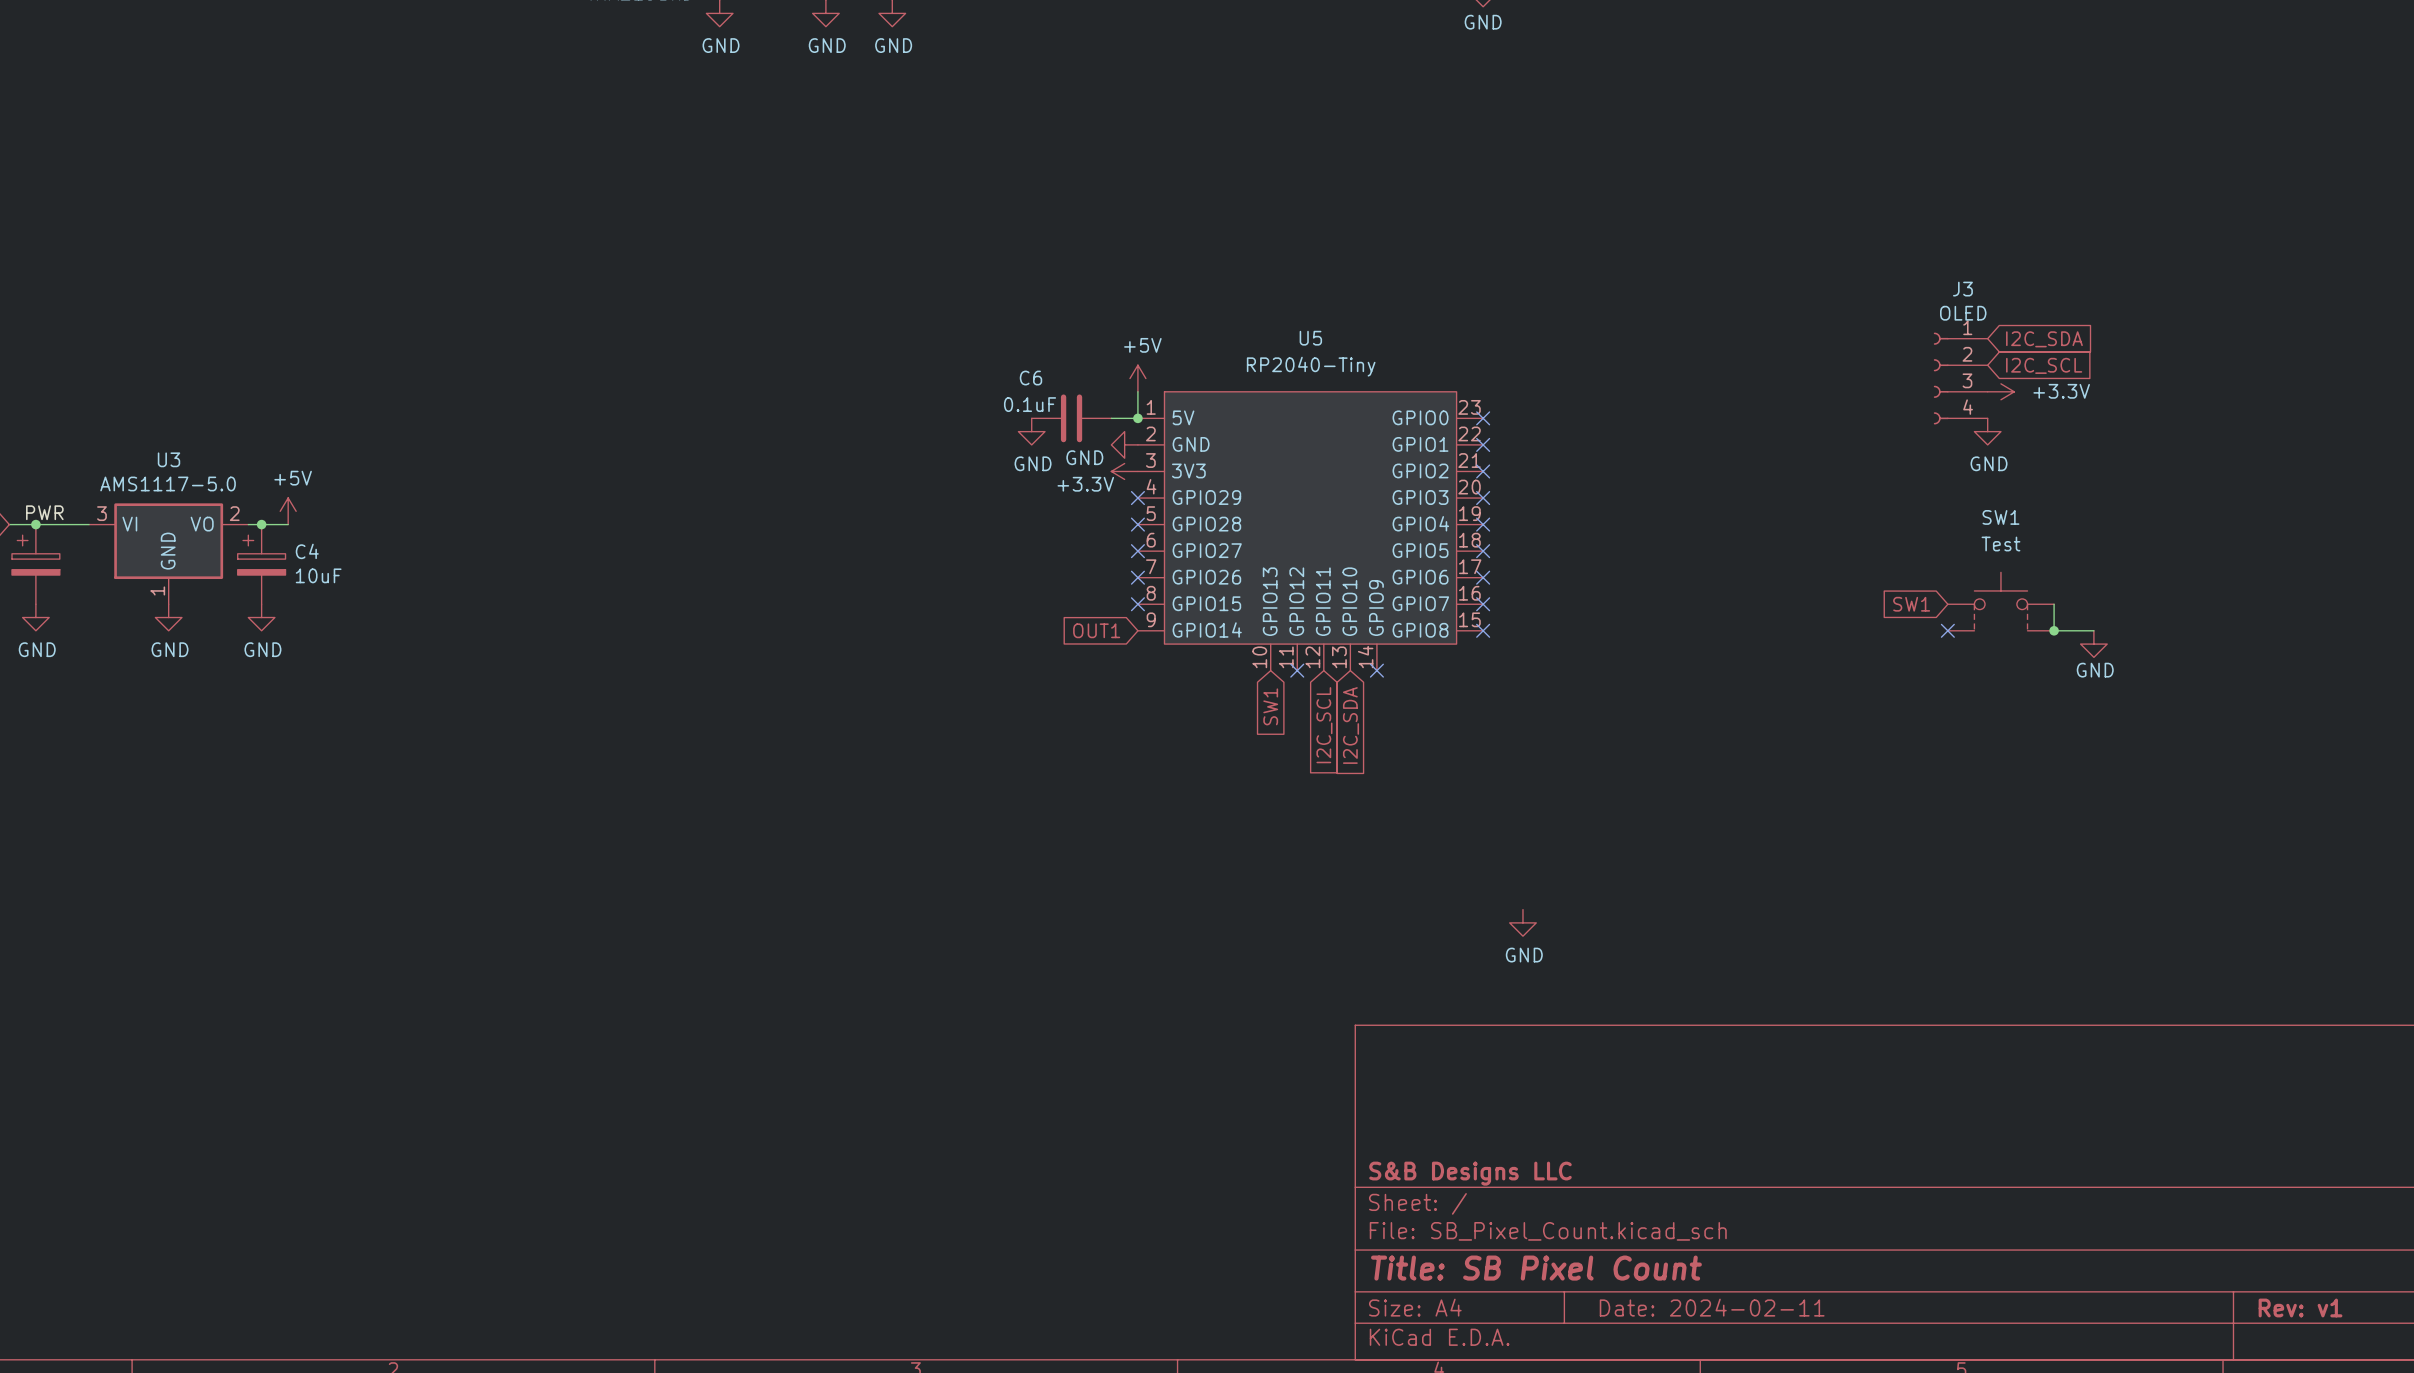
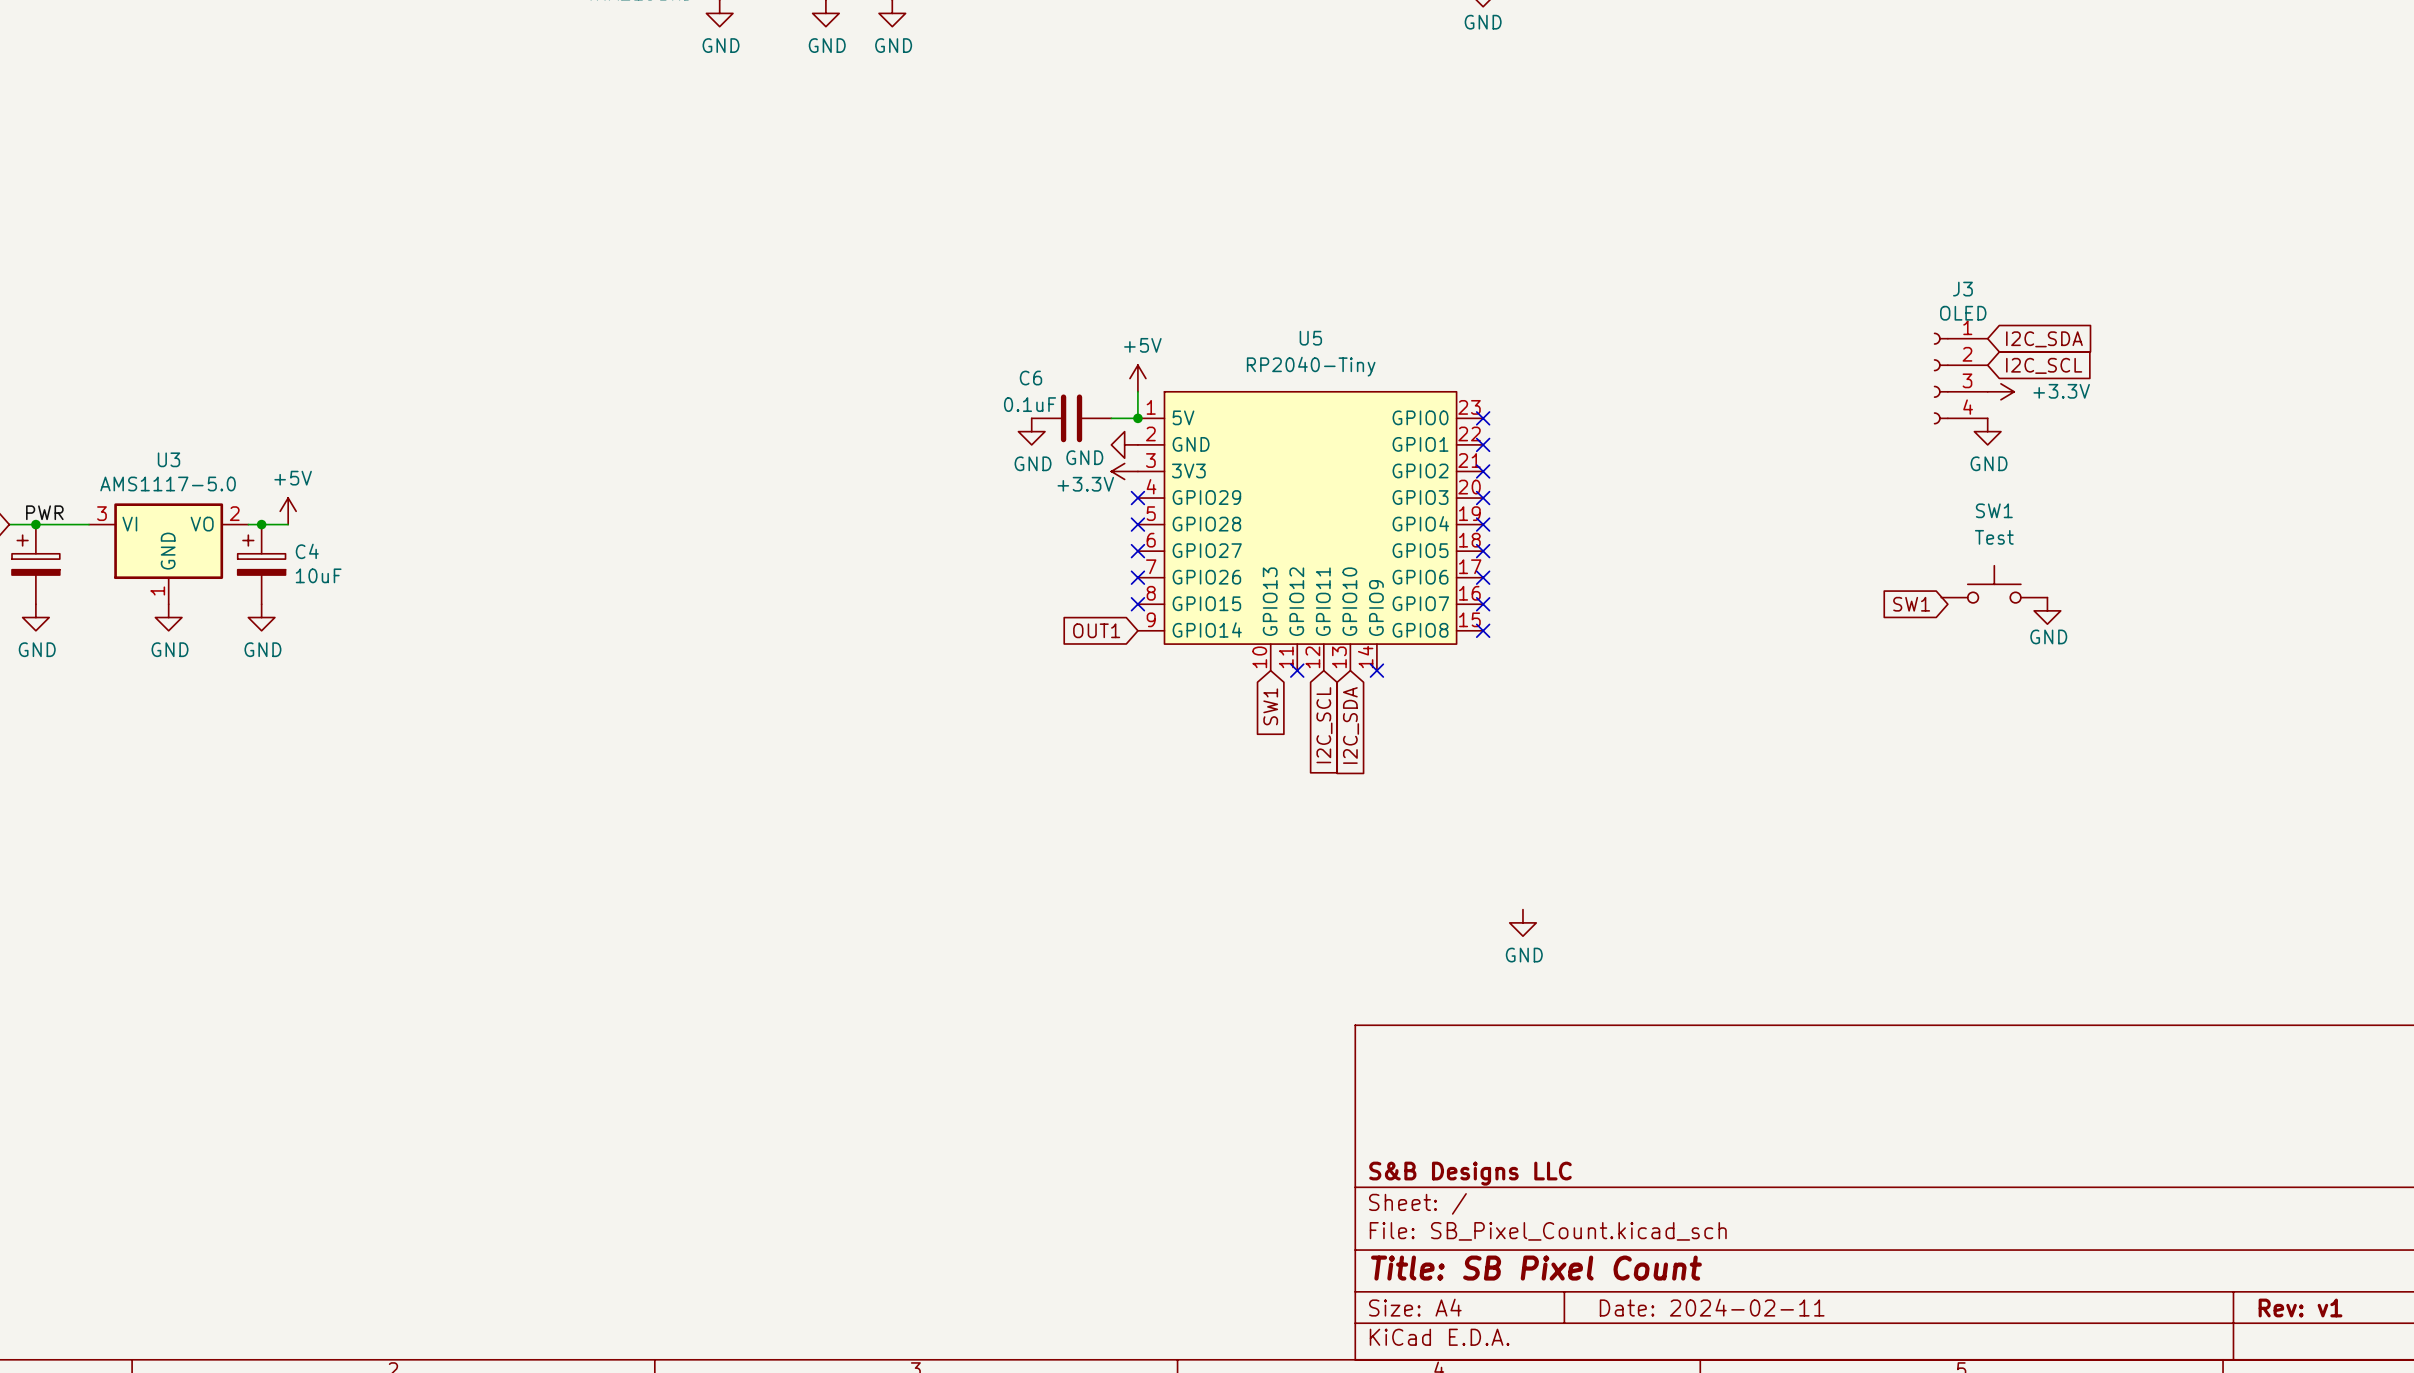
SW1 symbol: [1947, 572, 2055, 631] -> [1941, 565, 2048, 603]
wire: (2054, 604) (2054, 630) (2093, 630) -> none
no-connect mark: (1947, 630) -> none
junction: (2054, 630) -> none
power symbol position: GND (2093, 644) -> GND (2047, 610)

